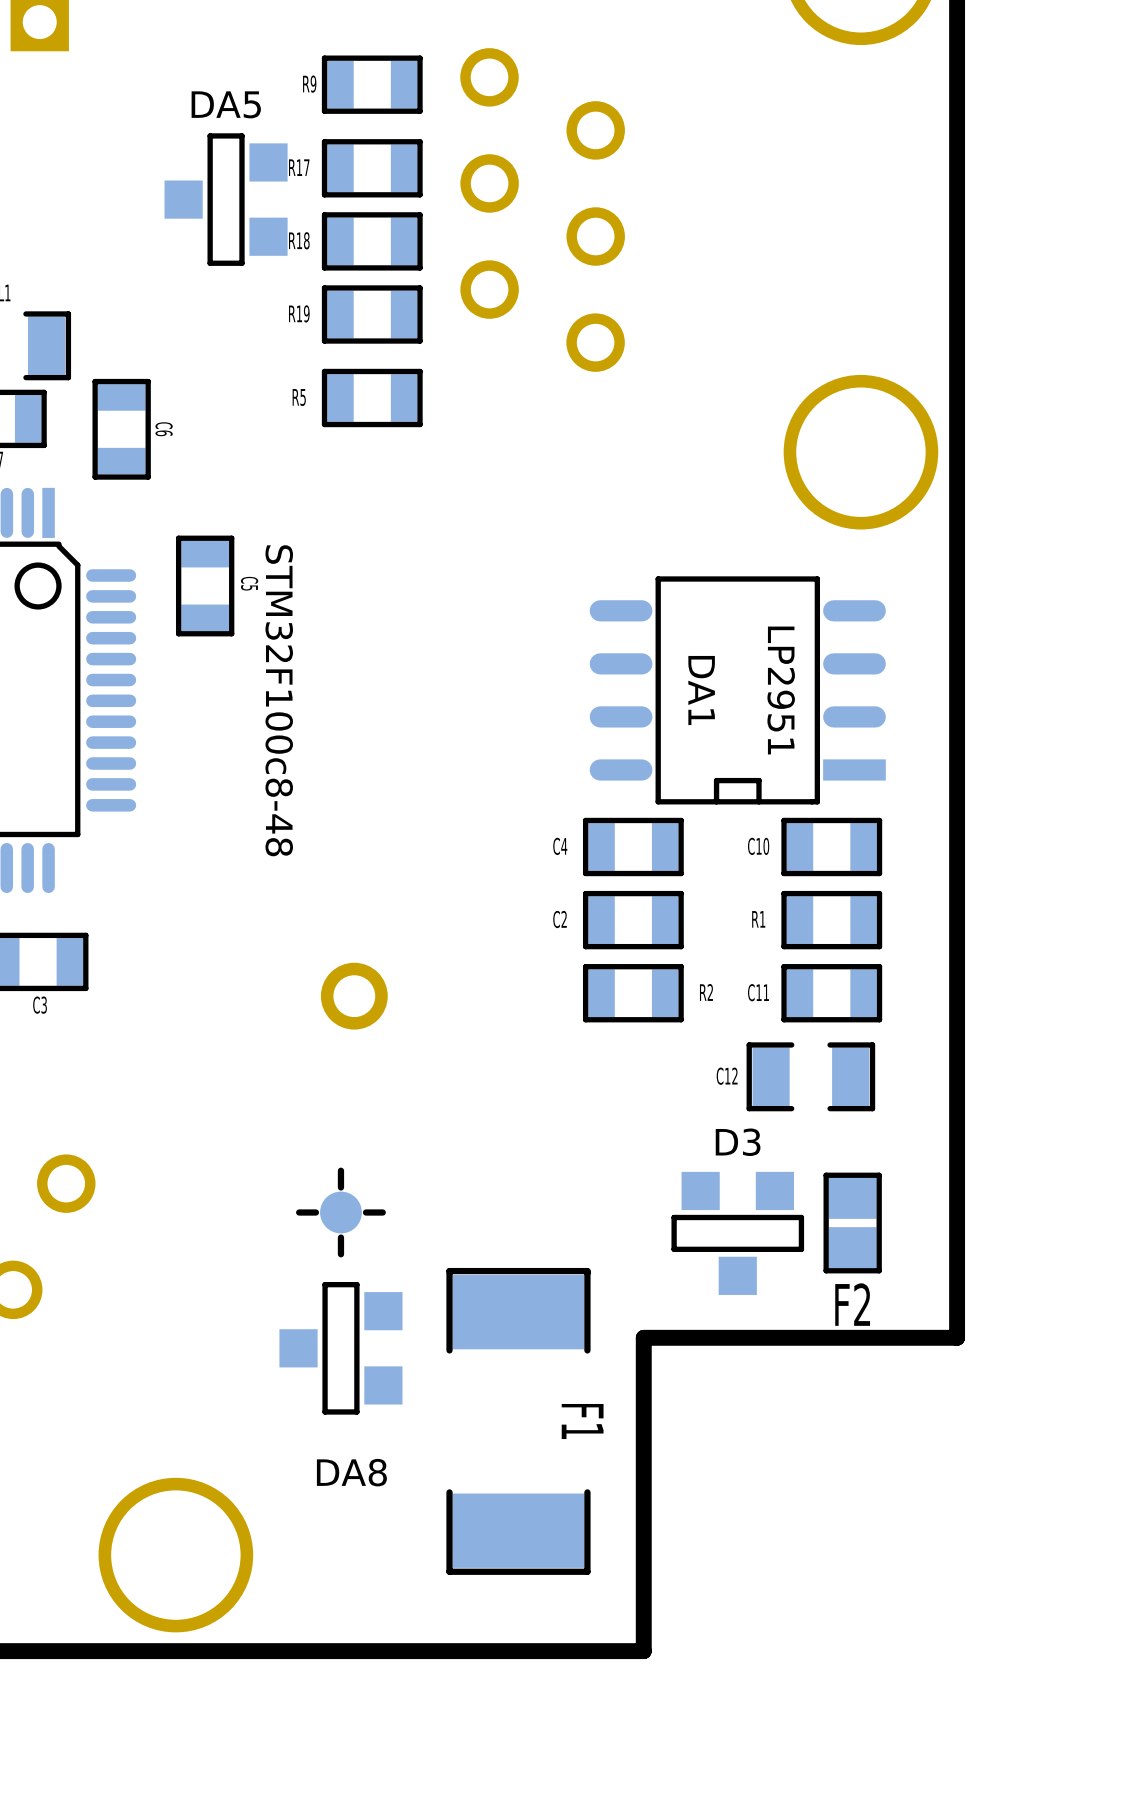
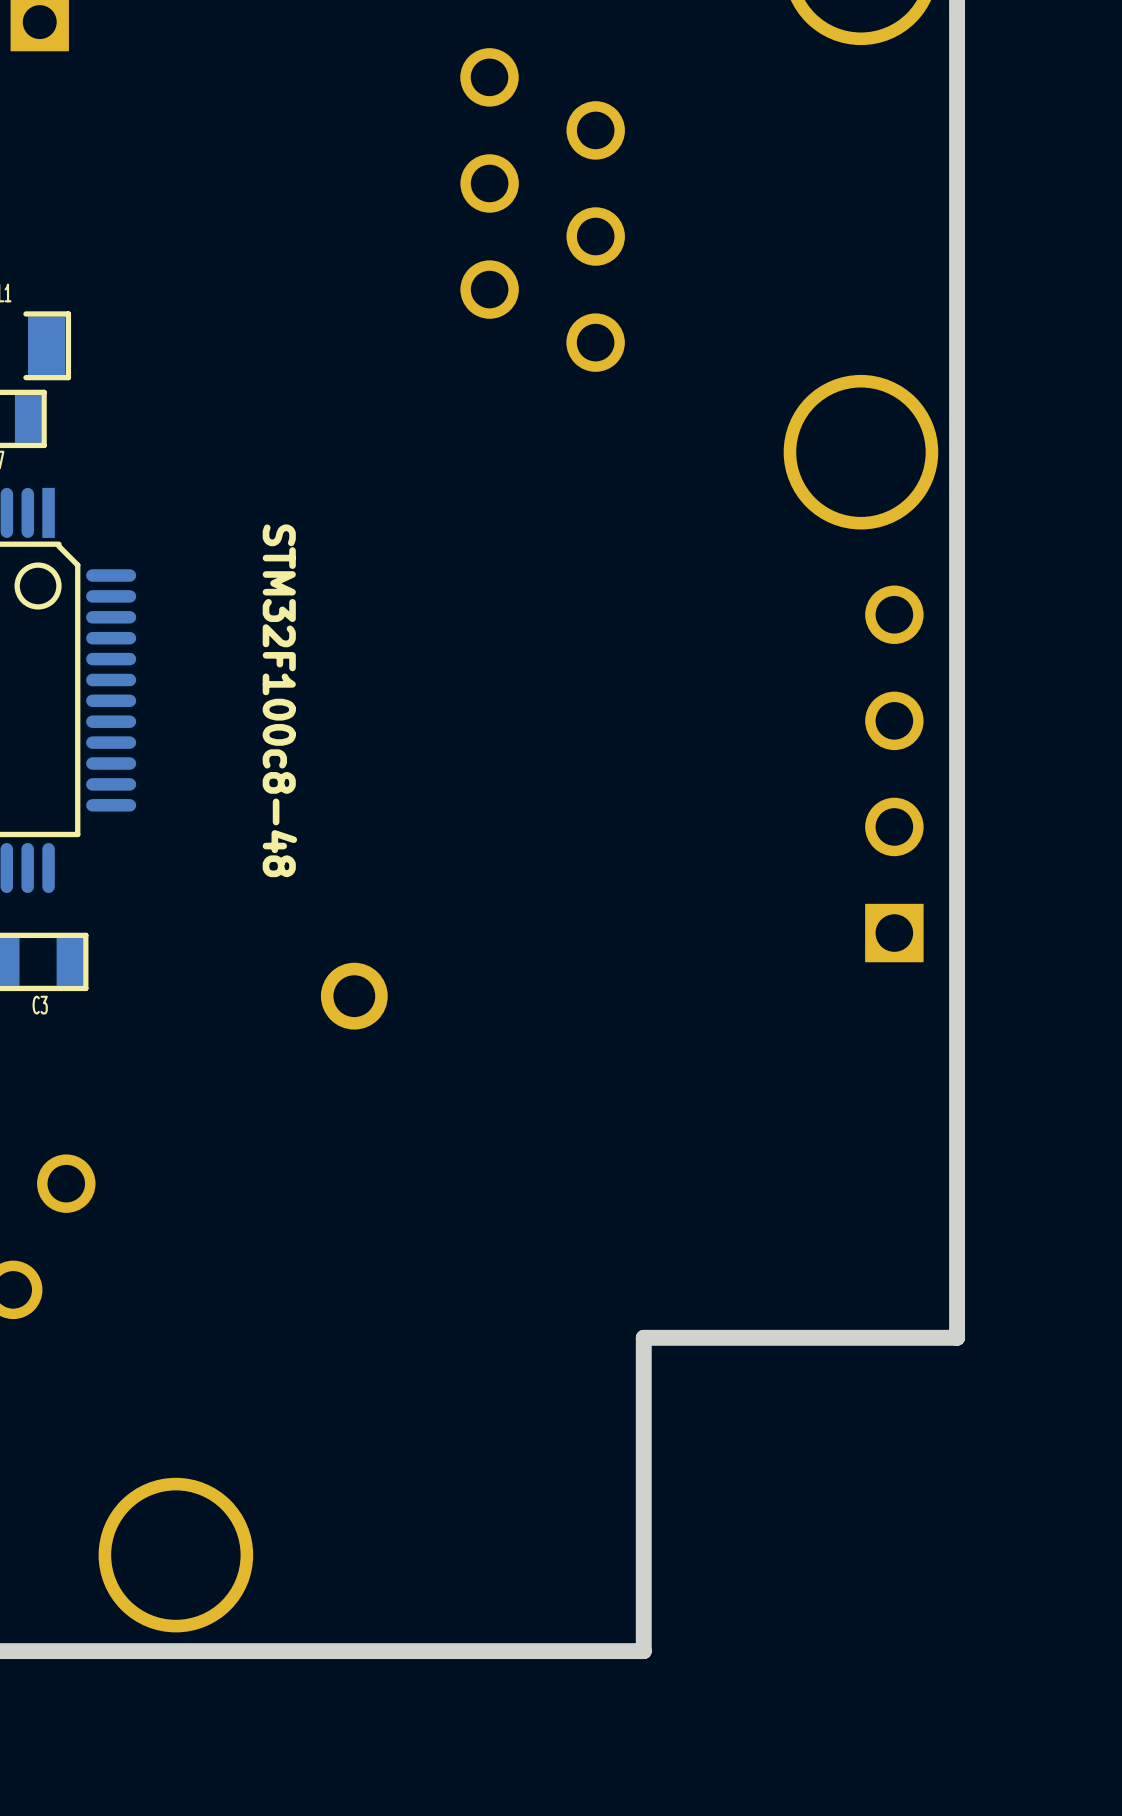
R9: (372, 84) -> none
R17: (372, 168) -> none
DA5: (226, 199) -> none
R18: (372, 241) -> none
R19: (372, 314) -> none
R5: (372, 398) -> none
C6: (121, 429) -> none
C5: (205, 586) -> none
DA1: LP2951 (737, 690) -> none
part: none -> (894, 773)
C4: (633, 847) -> none
C10: (831, 847) -> none
C2: (633, 920) -> none
R1: (831, 920) -> none
R2: (633, 993) -> none
C11: (831, 993) -> none
C12: (810, 1076) -> none
part: (340, 1212) -> none
F2: (852, 1223) -> none
D3: (737, 1233) -> none
DA8: (340, 1348) -> none
F1: (518, 1421) -> none

